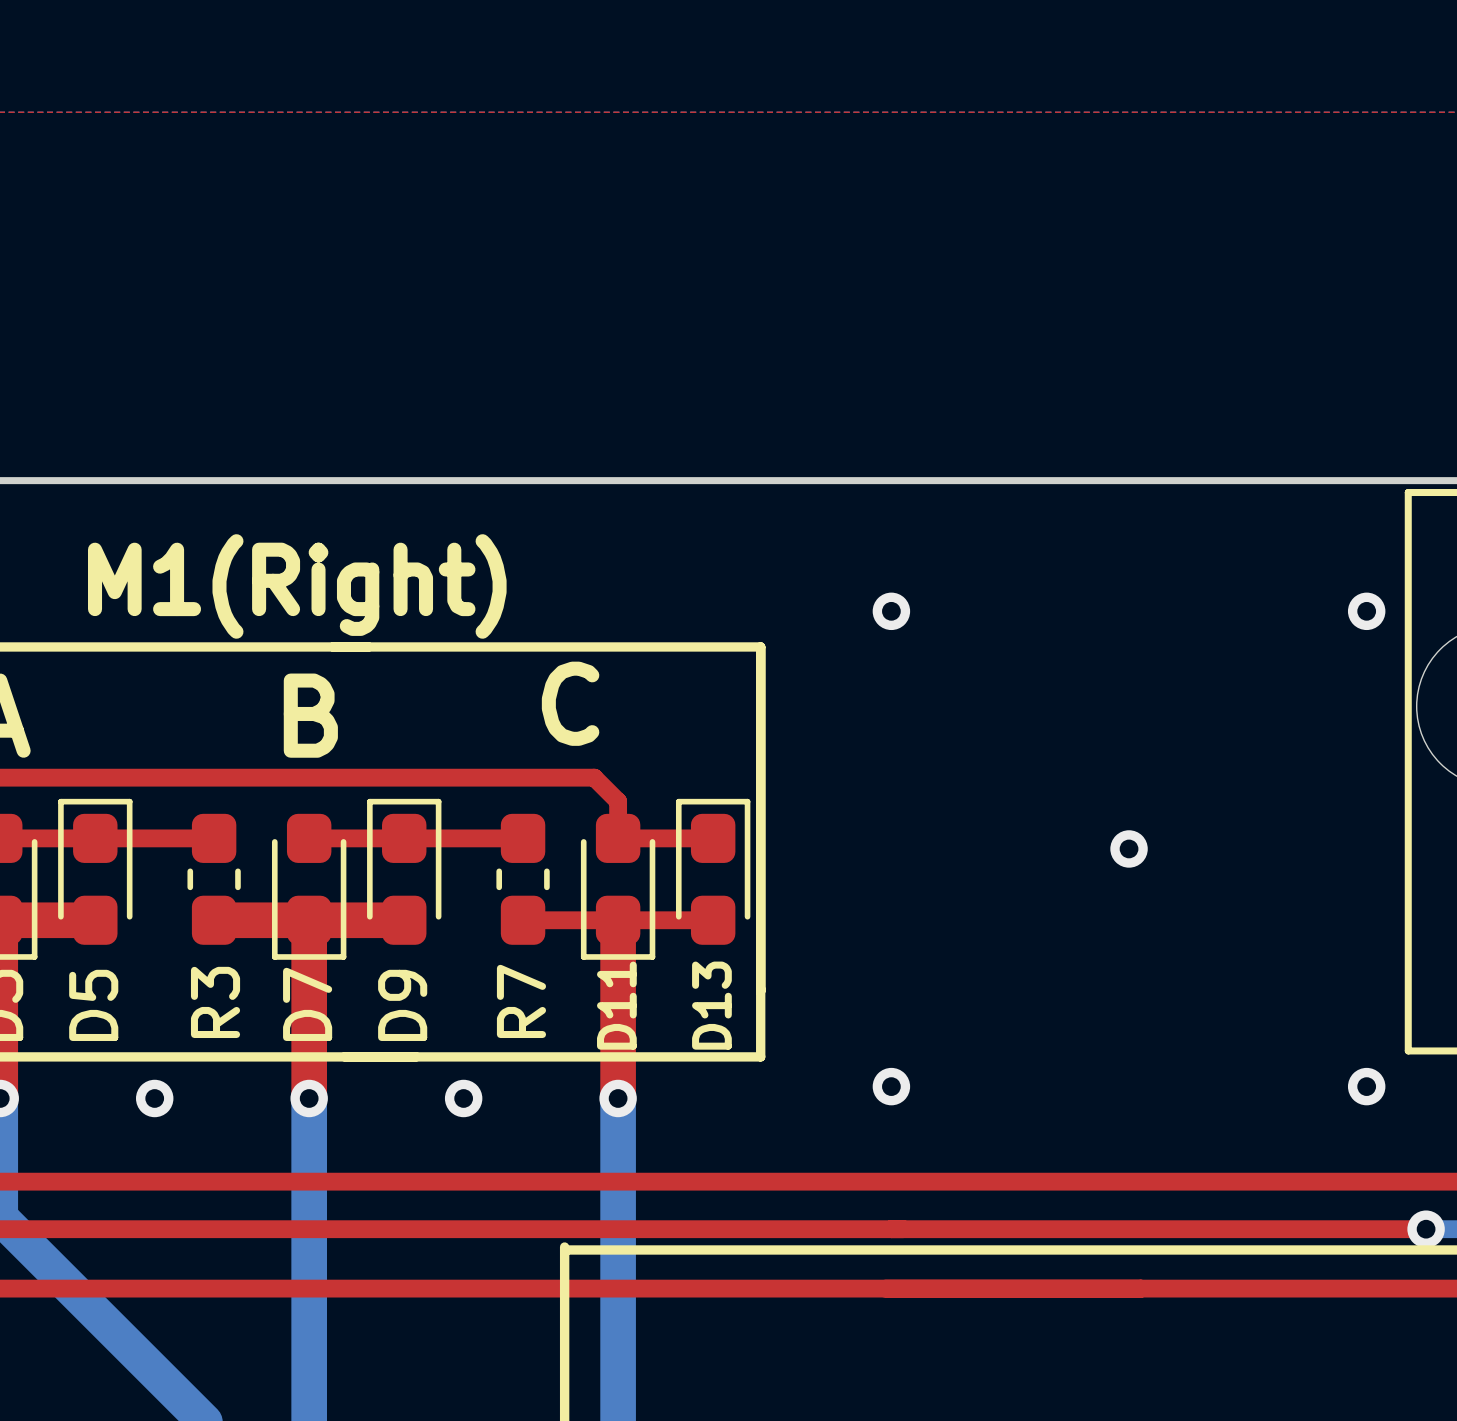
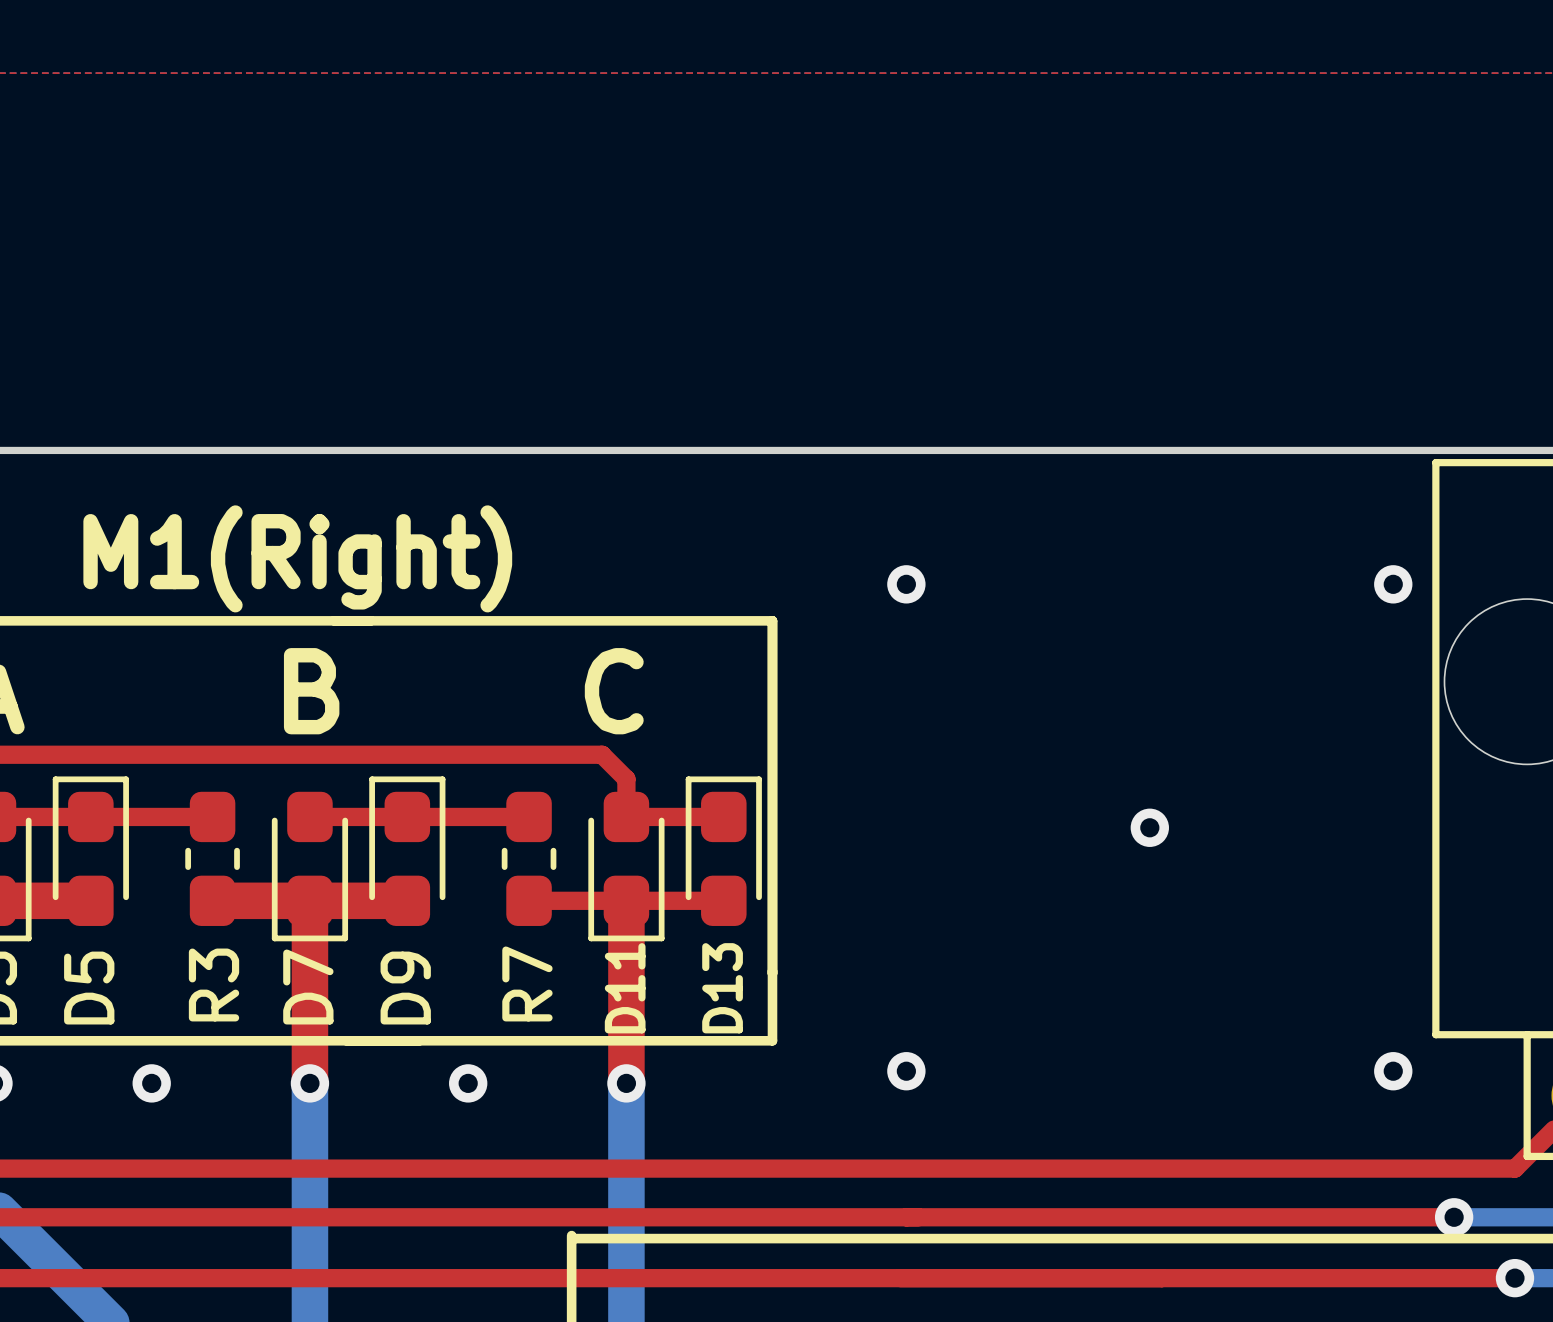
text position: C (570, 703) -> C (614, 691)

